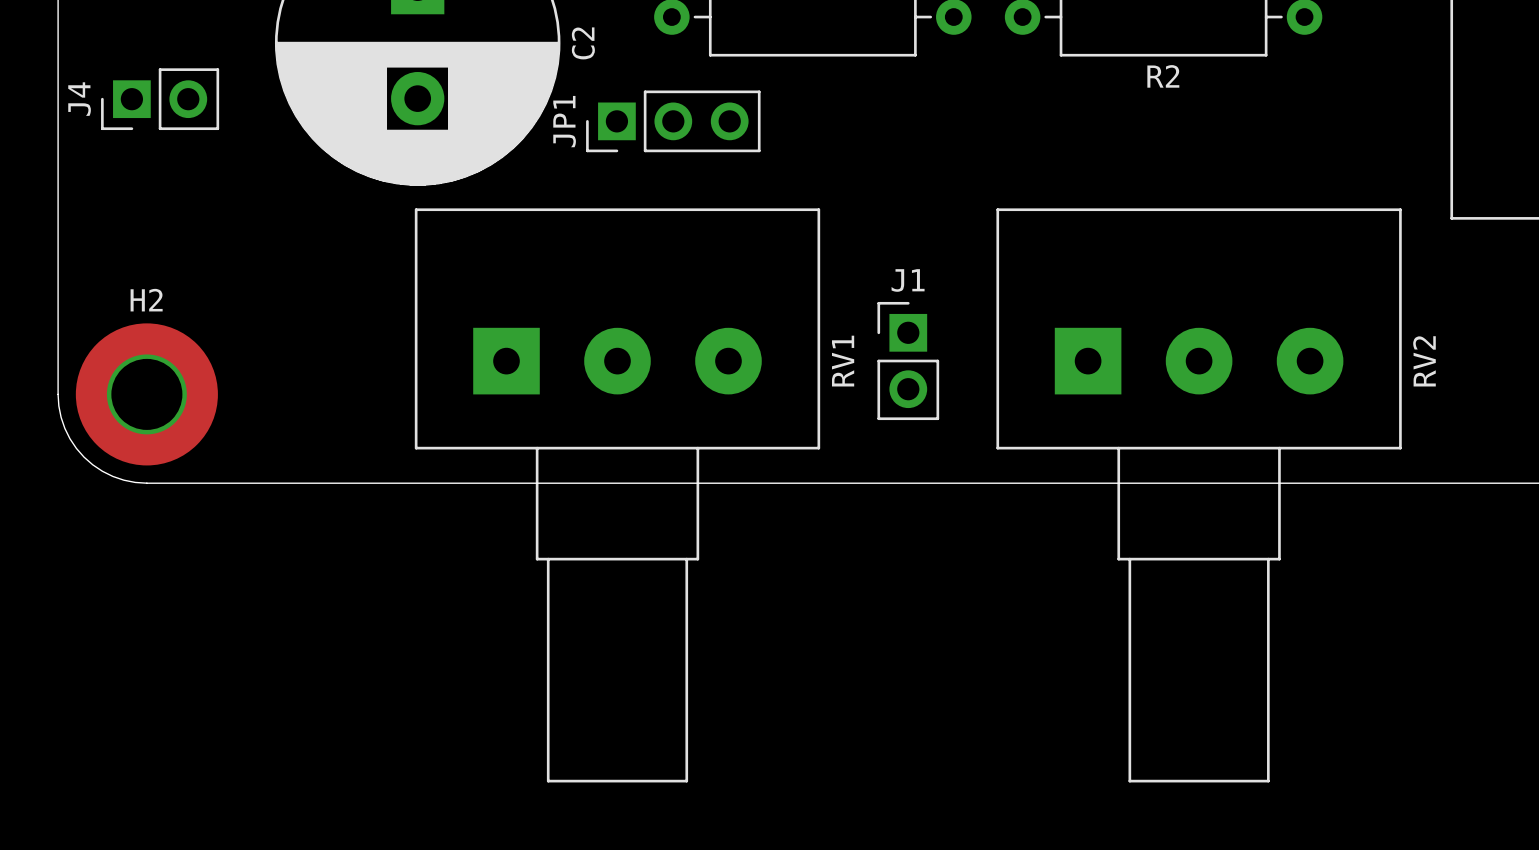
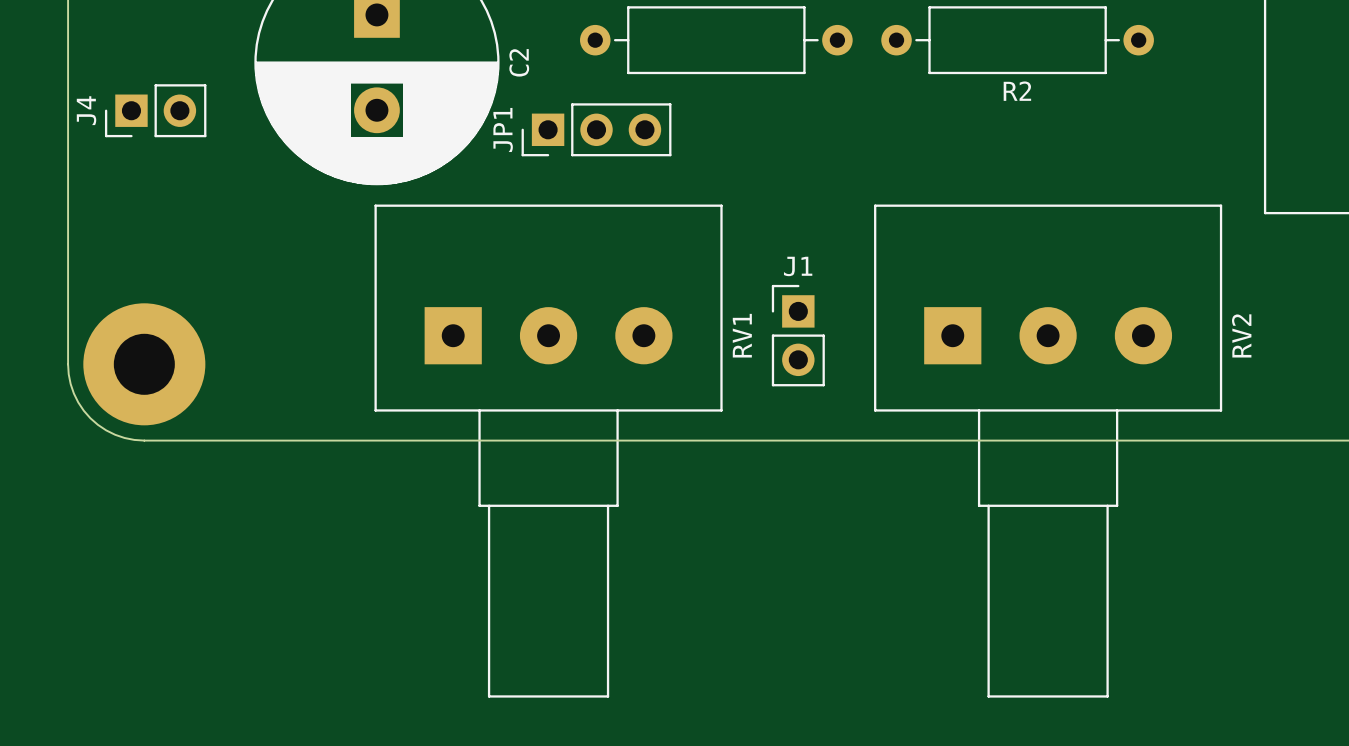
H2 name: H2 (146, 300) -> none

